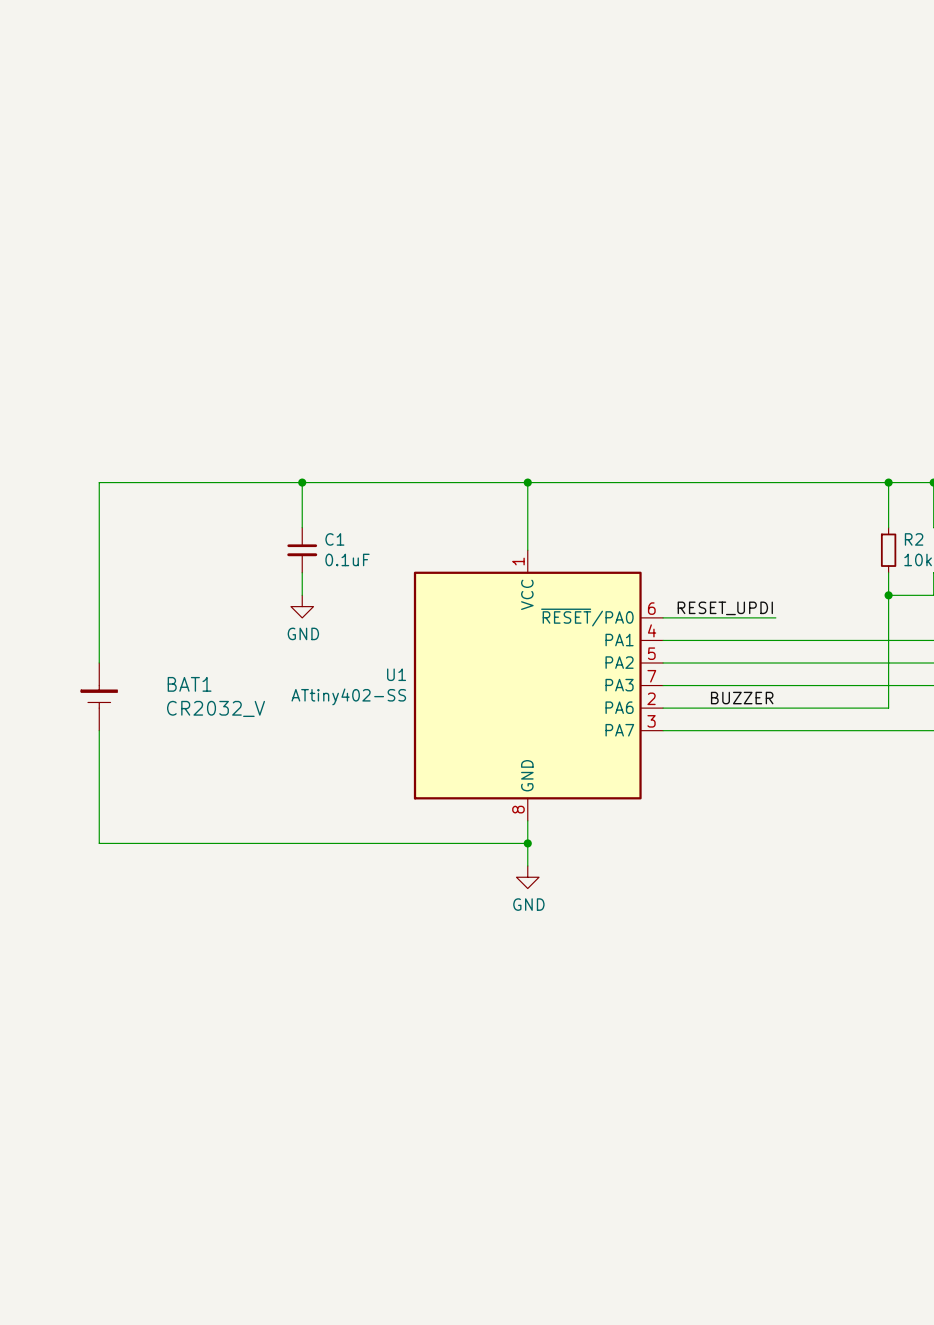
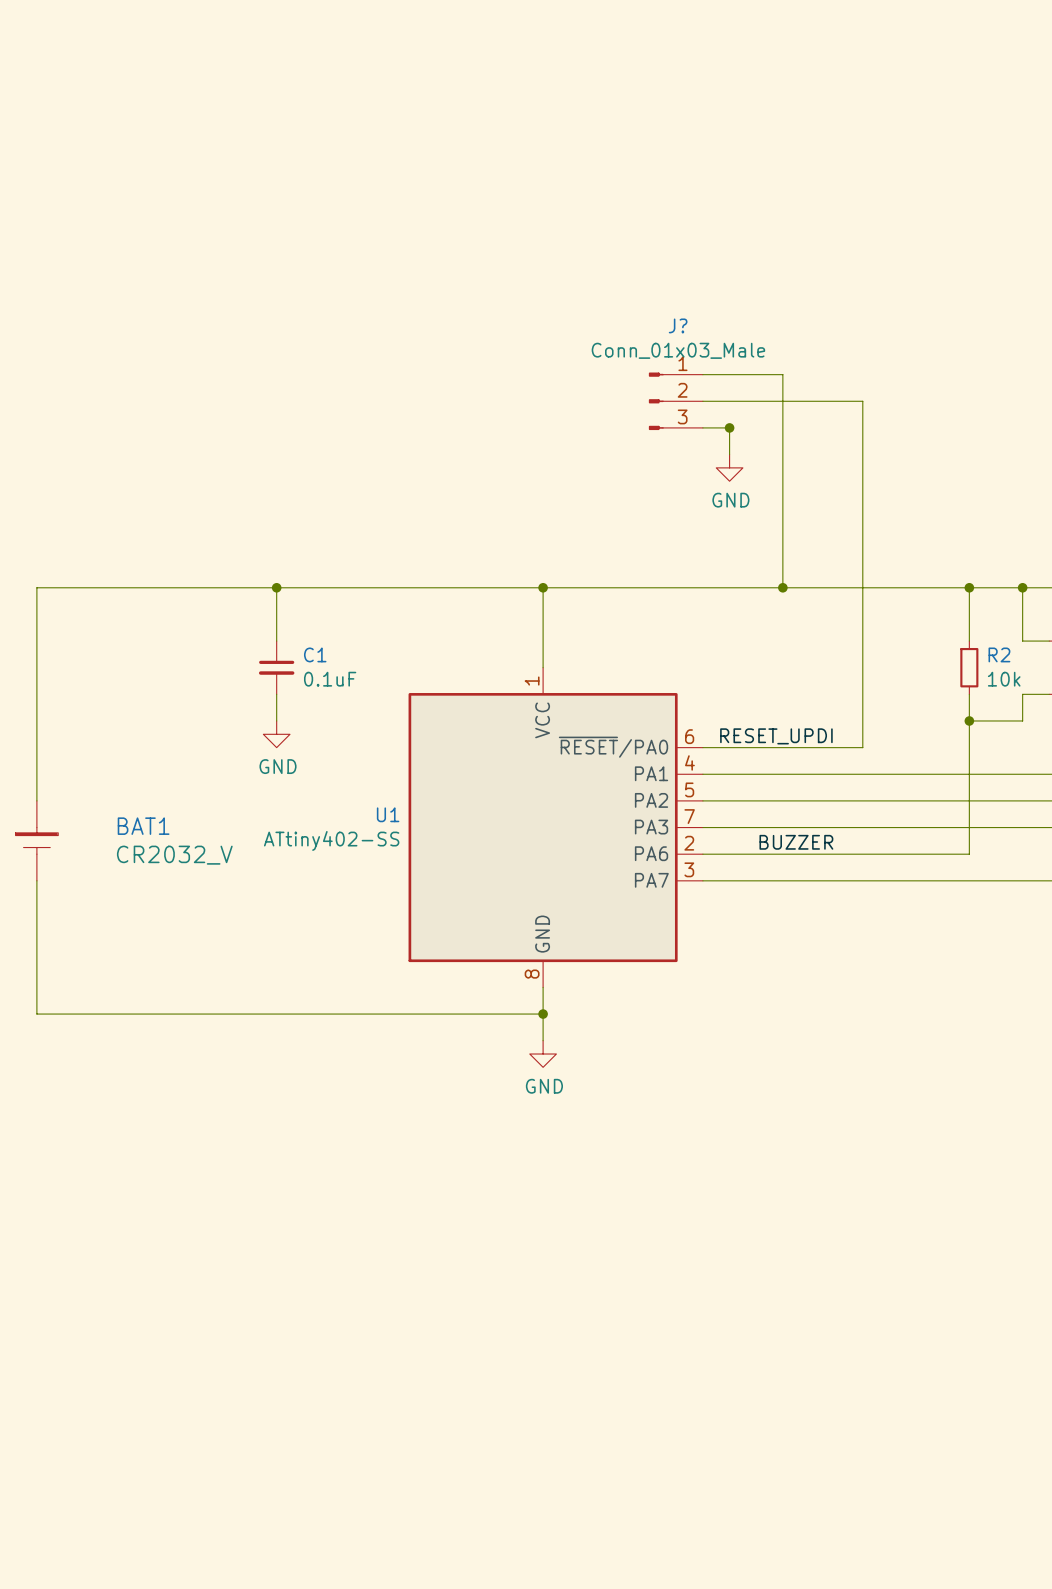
wire: none -> (702, 374) (782, 374) (782, 587)
J?: none -> Conn_01x03_Male (675, 401)
wire: none -> (702, 401) (862, 401) (862, 747) (836, 747)
wire: none -> (702, 427) (729, 427) (729, 454)
junction: none -> (729, 427)
power symbol: none -> GND (729, 467)
junction: none -> (782, 587)

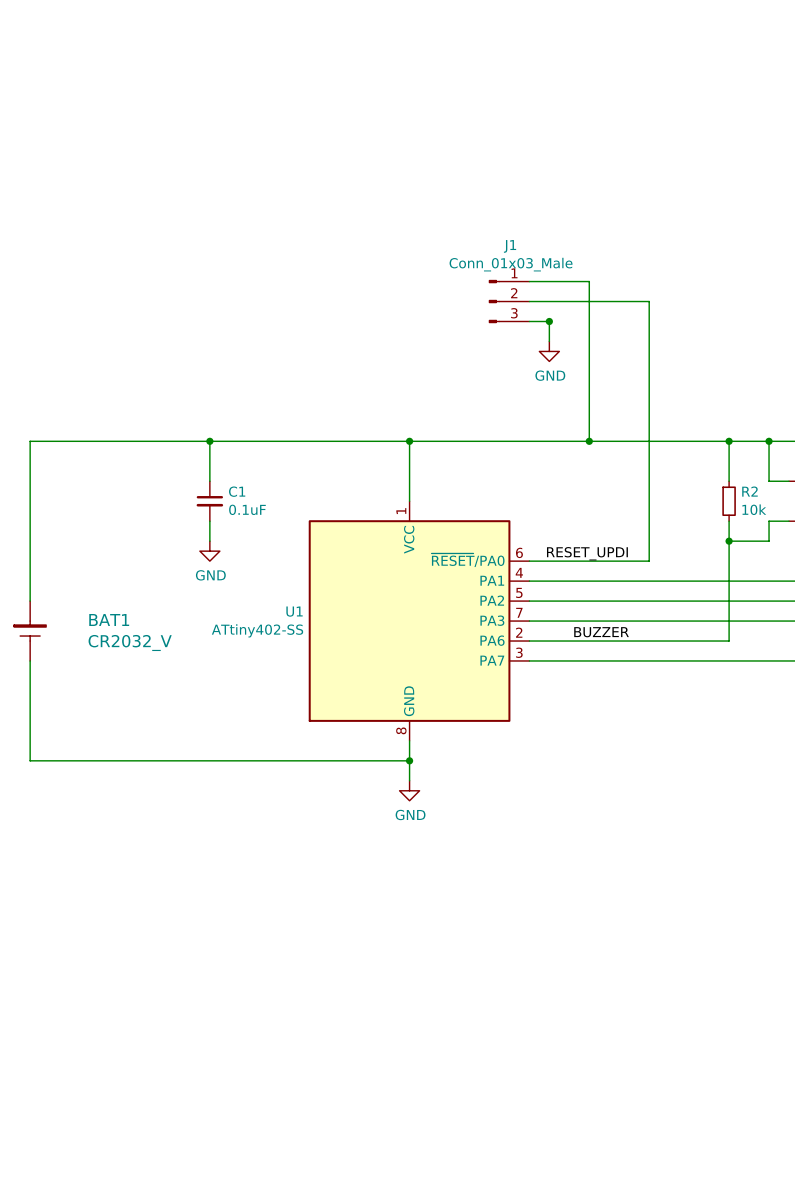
J? name: J? (678, 325) -> J1 (510, 246)

